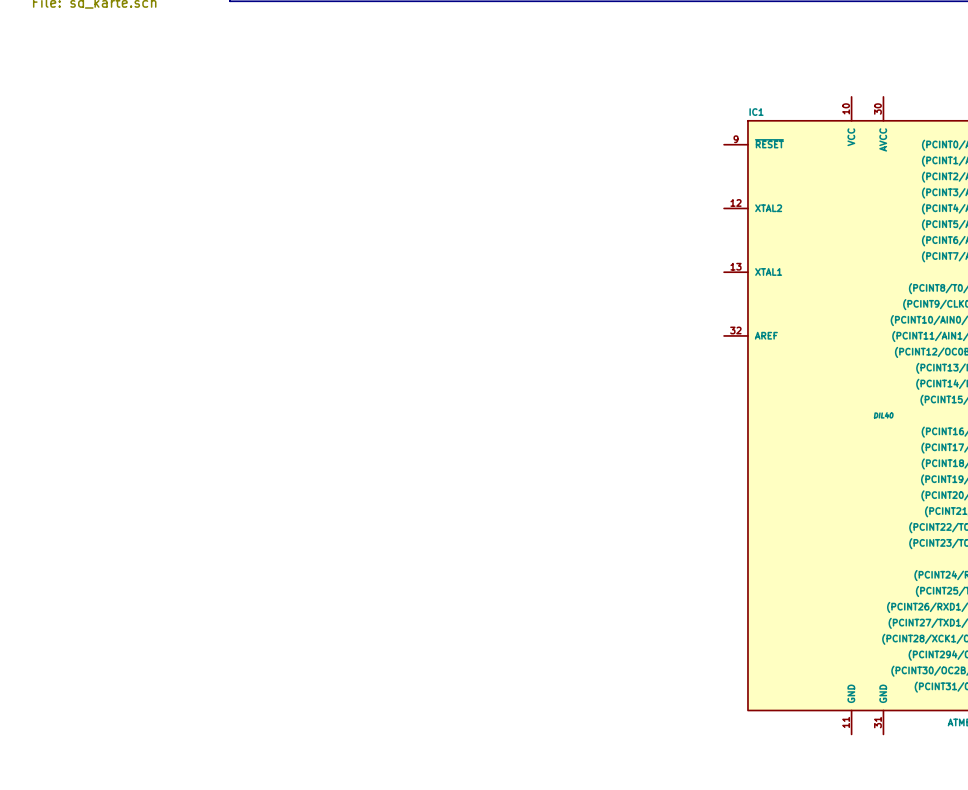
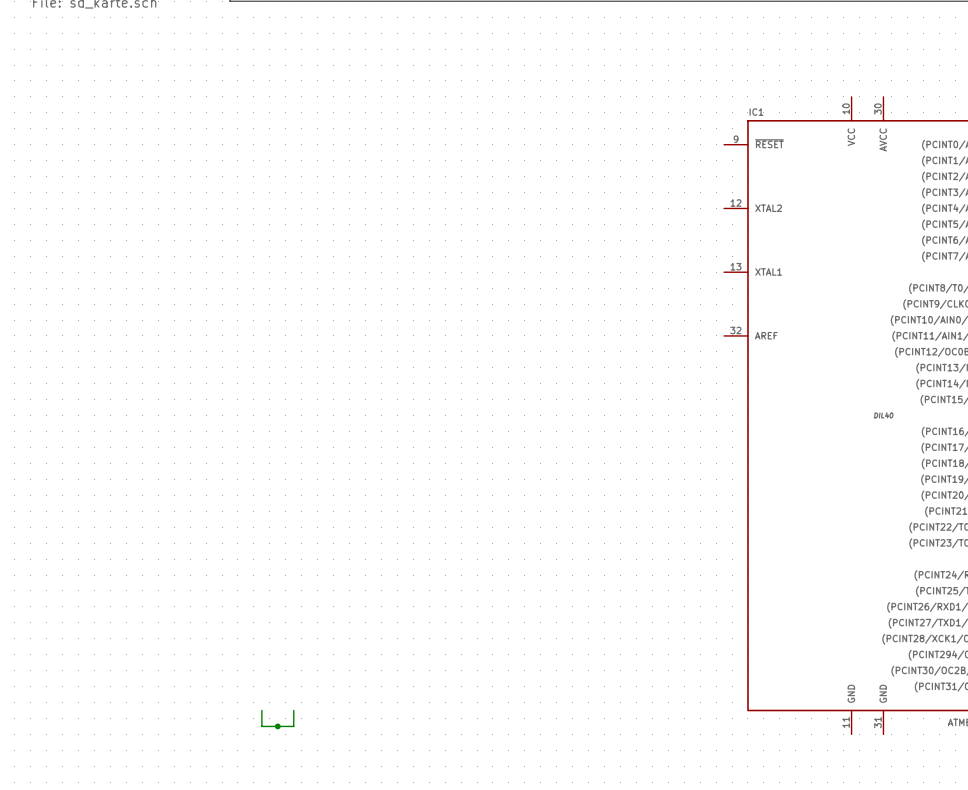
wire: none -> (261, 710) (261, 726) (293, 726) (293, 710)
junction: none -> (277, 726)

